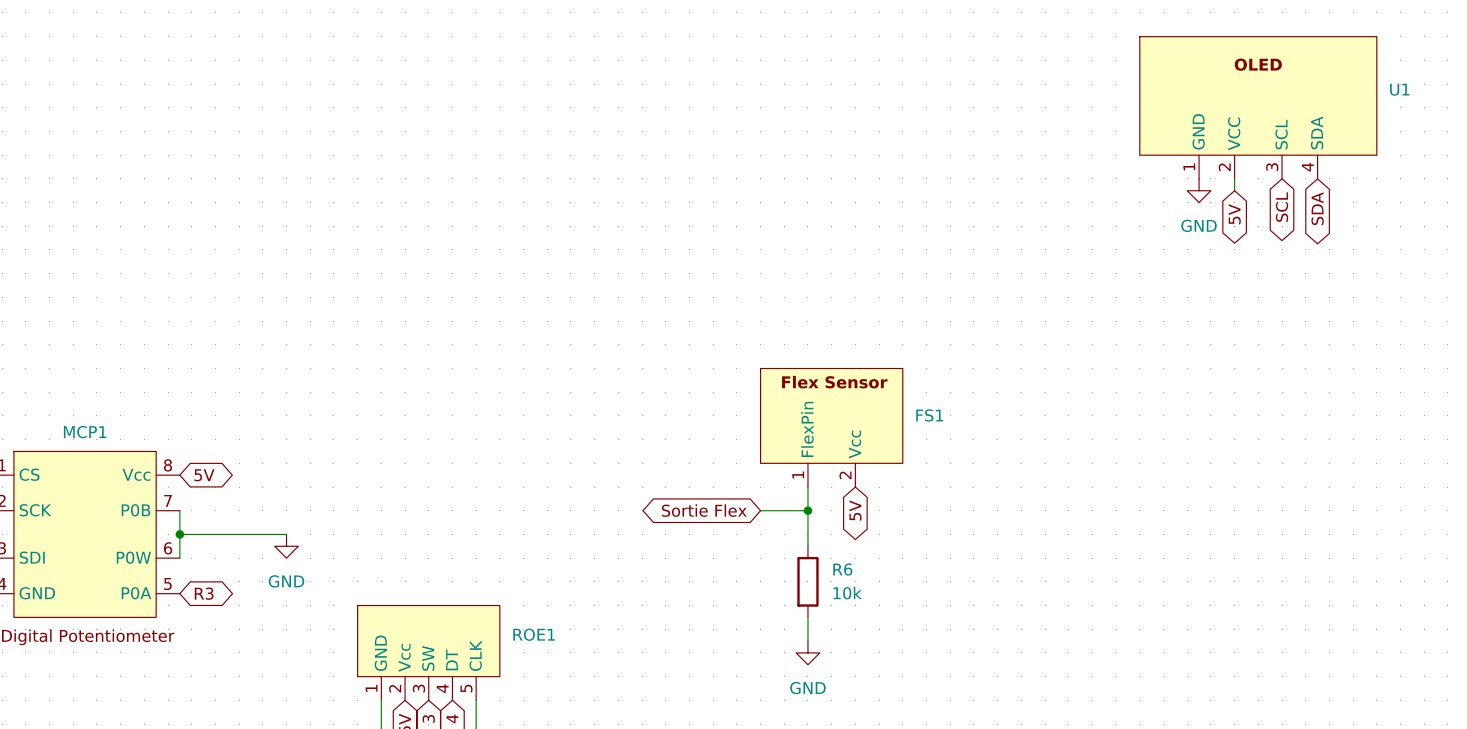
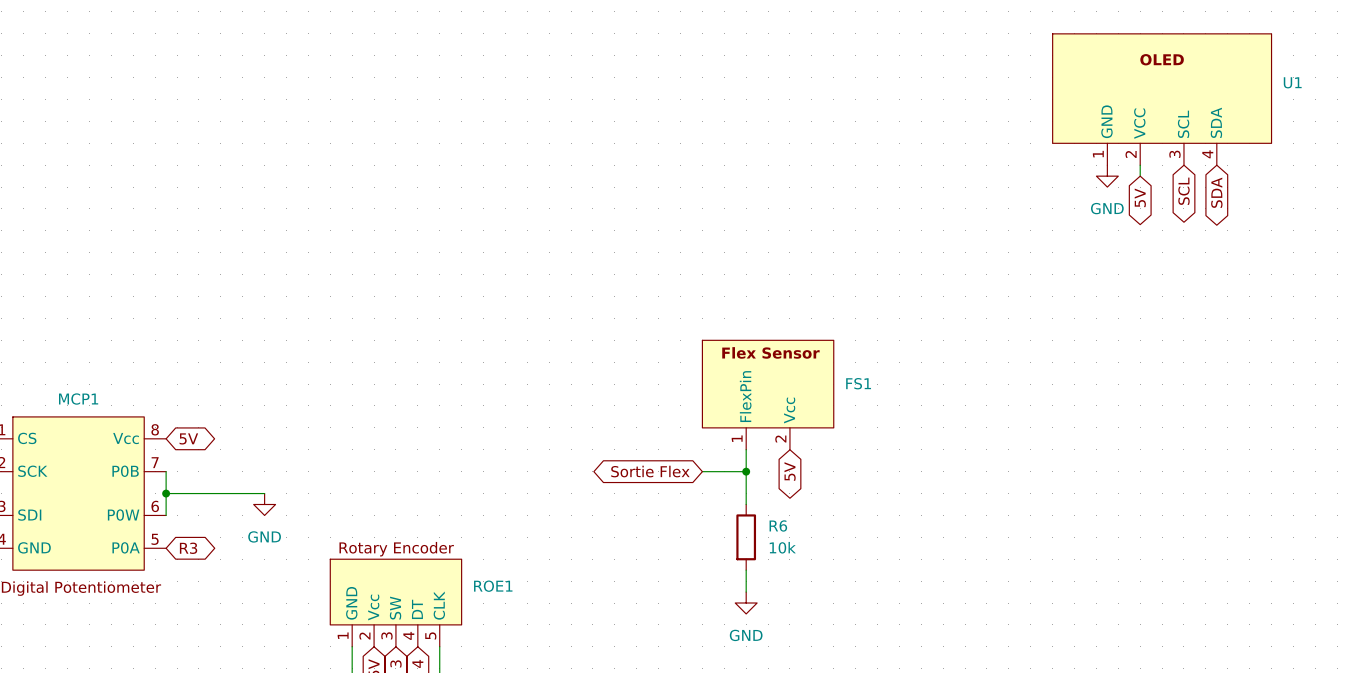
ROE1 text: none -> Rotary Encoder (396, 549)

